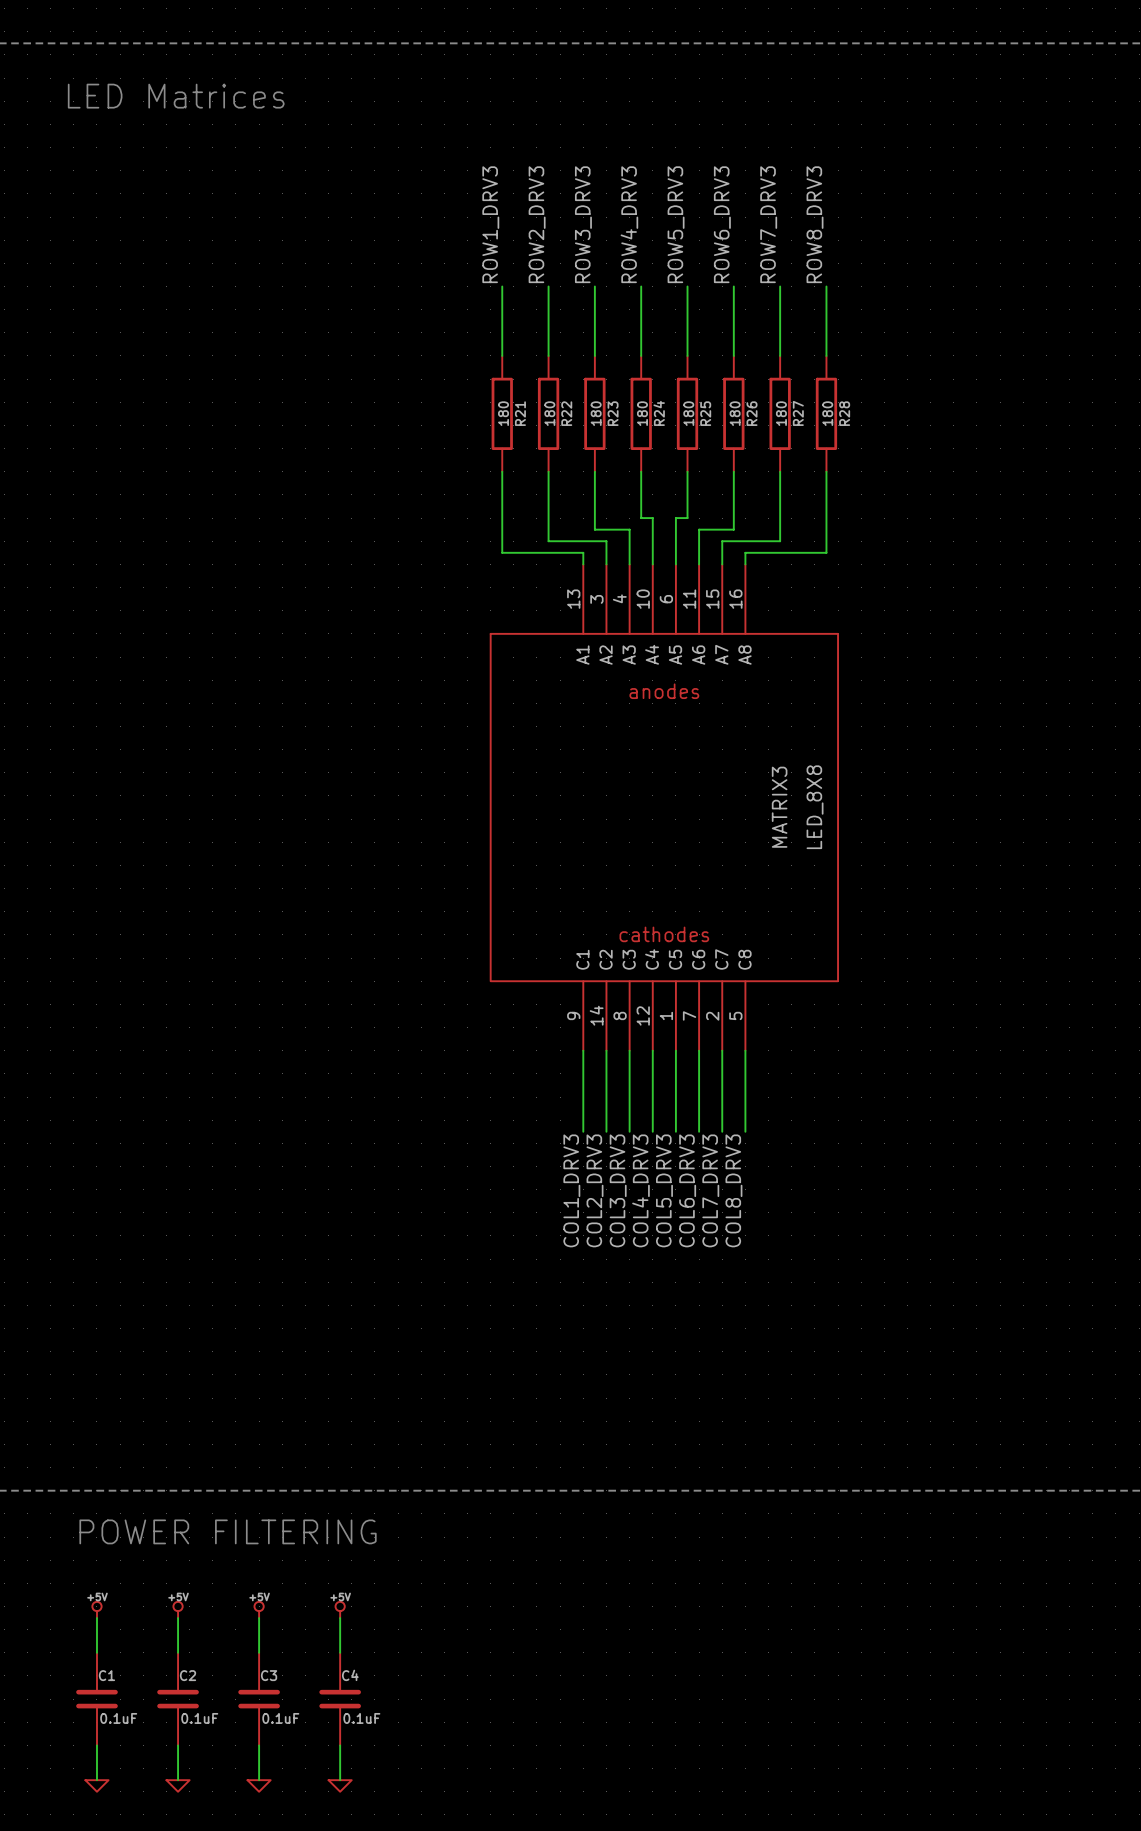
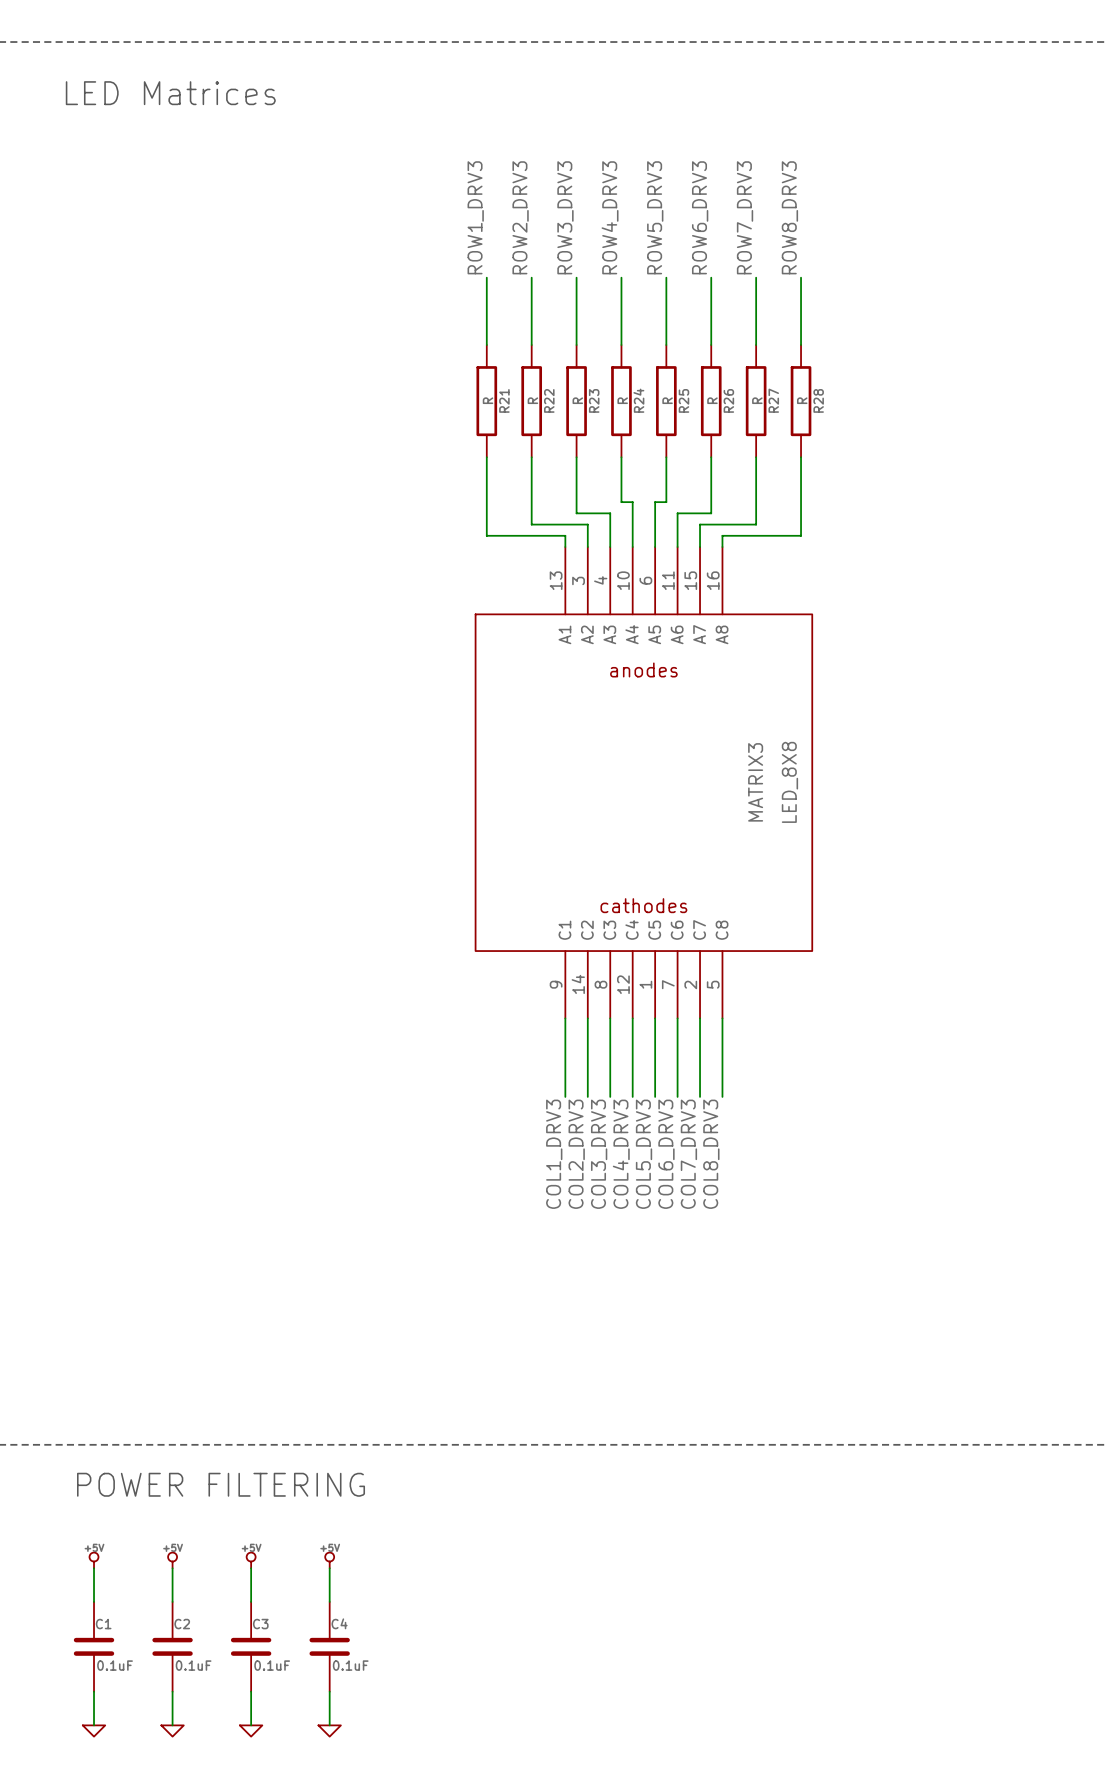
R21 value: 180 (503, 413) -> R (488, 400)
R22 value: 180 (549, 413) -> R (532, 400)
R23 value: 180 (596, 413) -> R (577, 400)
R24 value: 180 (642, 413) -> R (622, 400)
R25 value: 180 (688, 413) -> R (667, 400)
R26 value: 180 (735, 413) -> R (712, 400)
R27 value: 180 (781, 413) -> R (757, 400)
R28 value: 180 (827, 413) -> R (802, 400)

